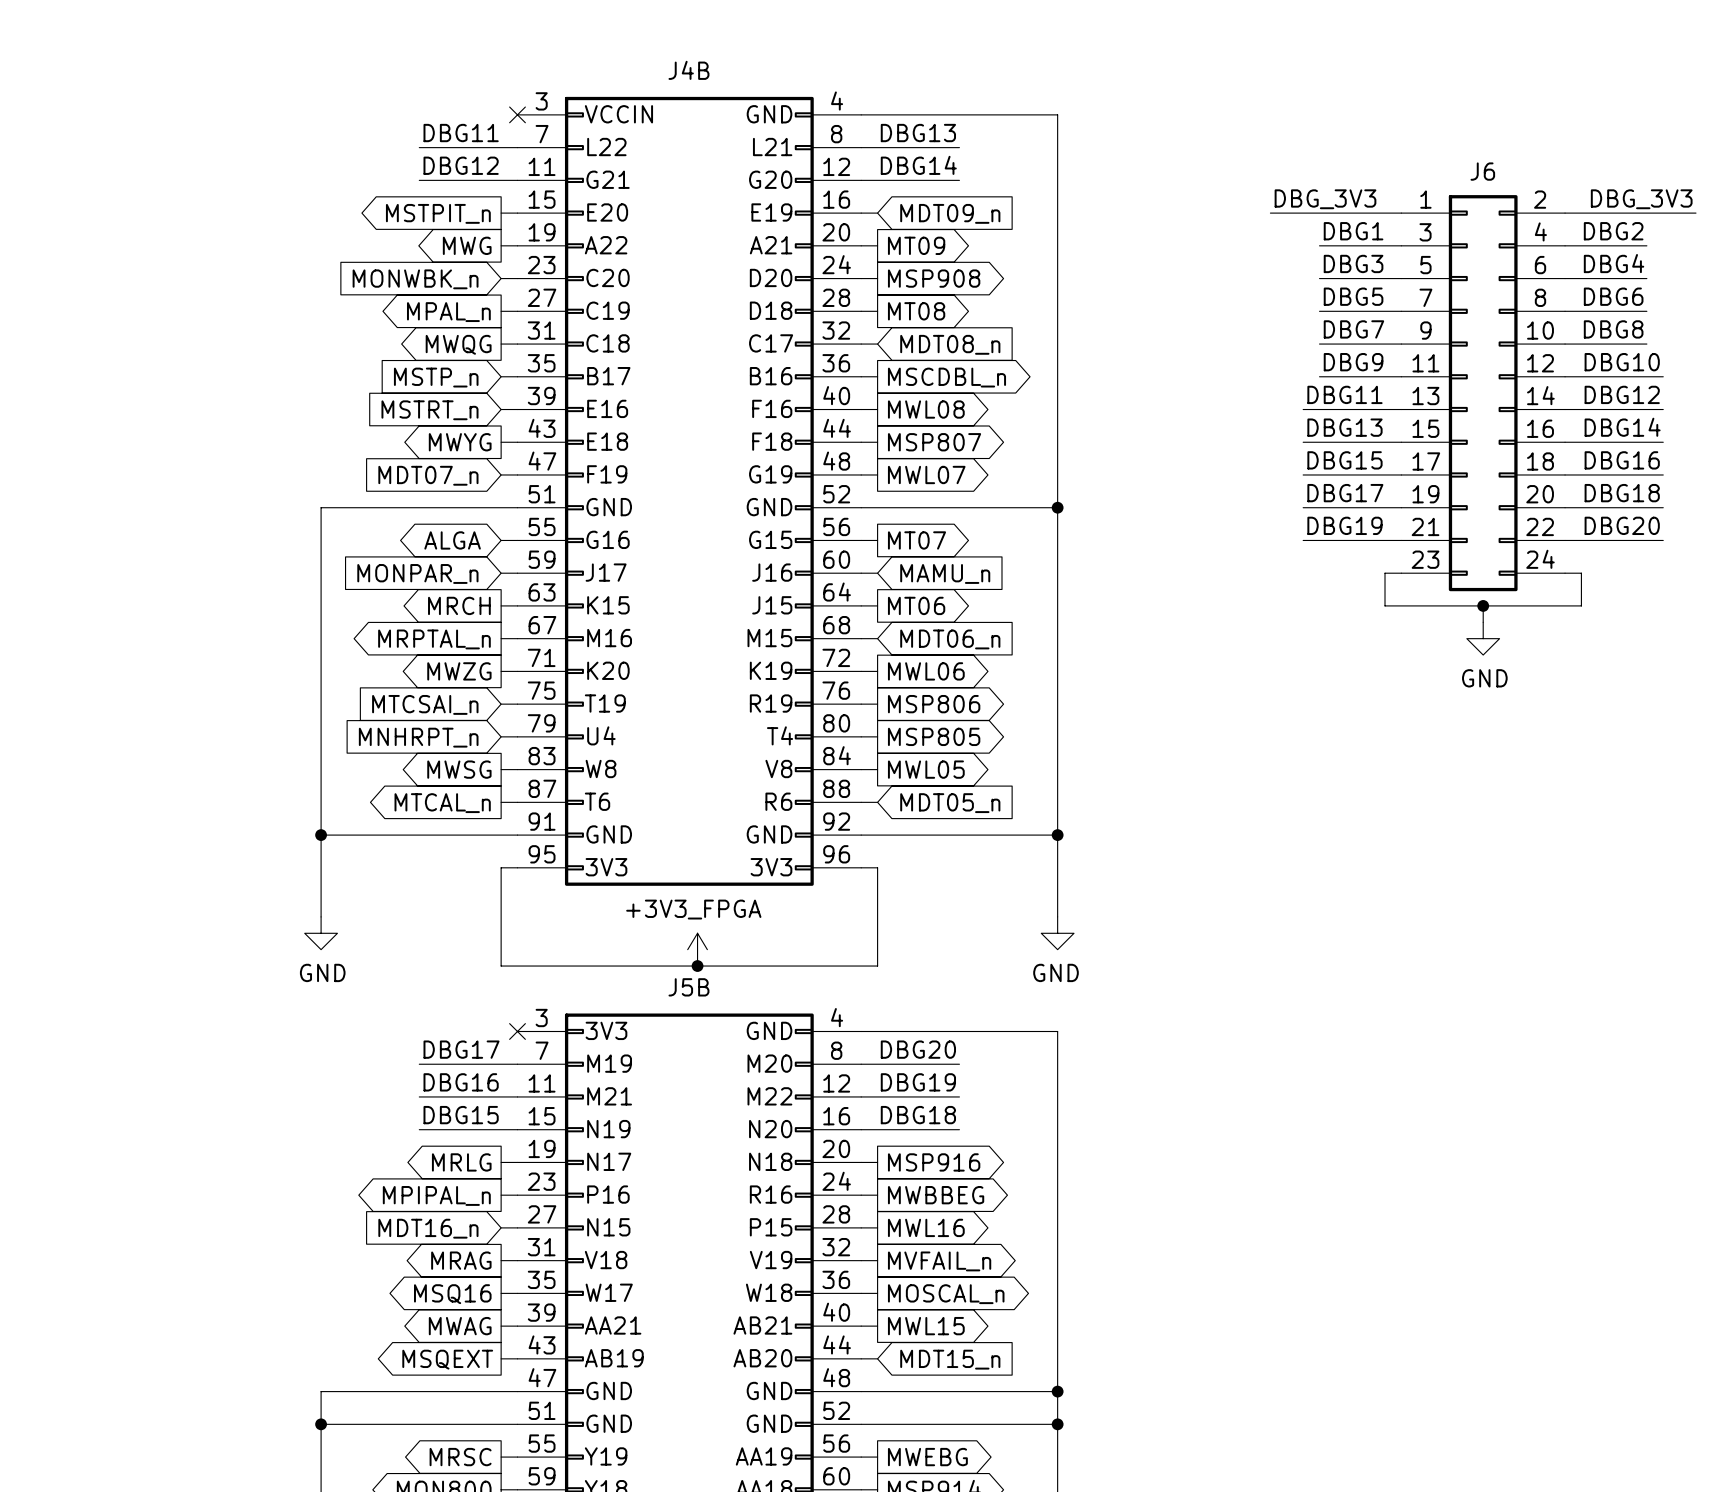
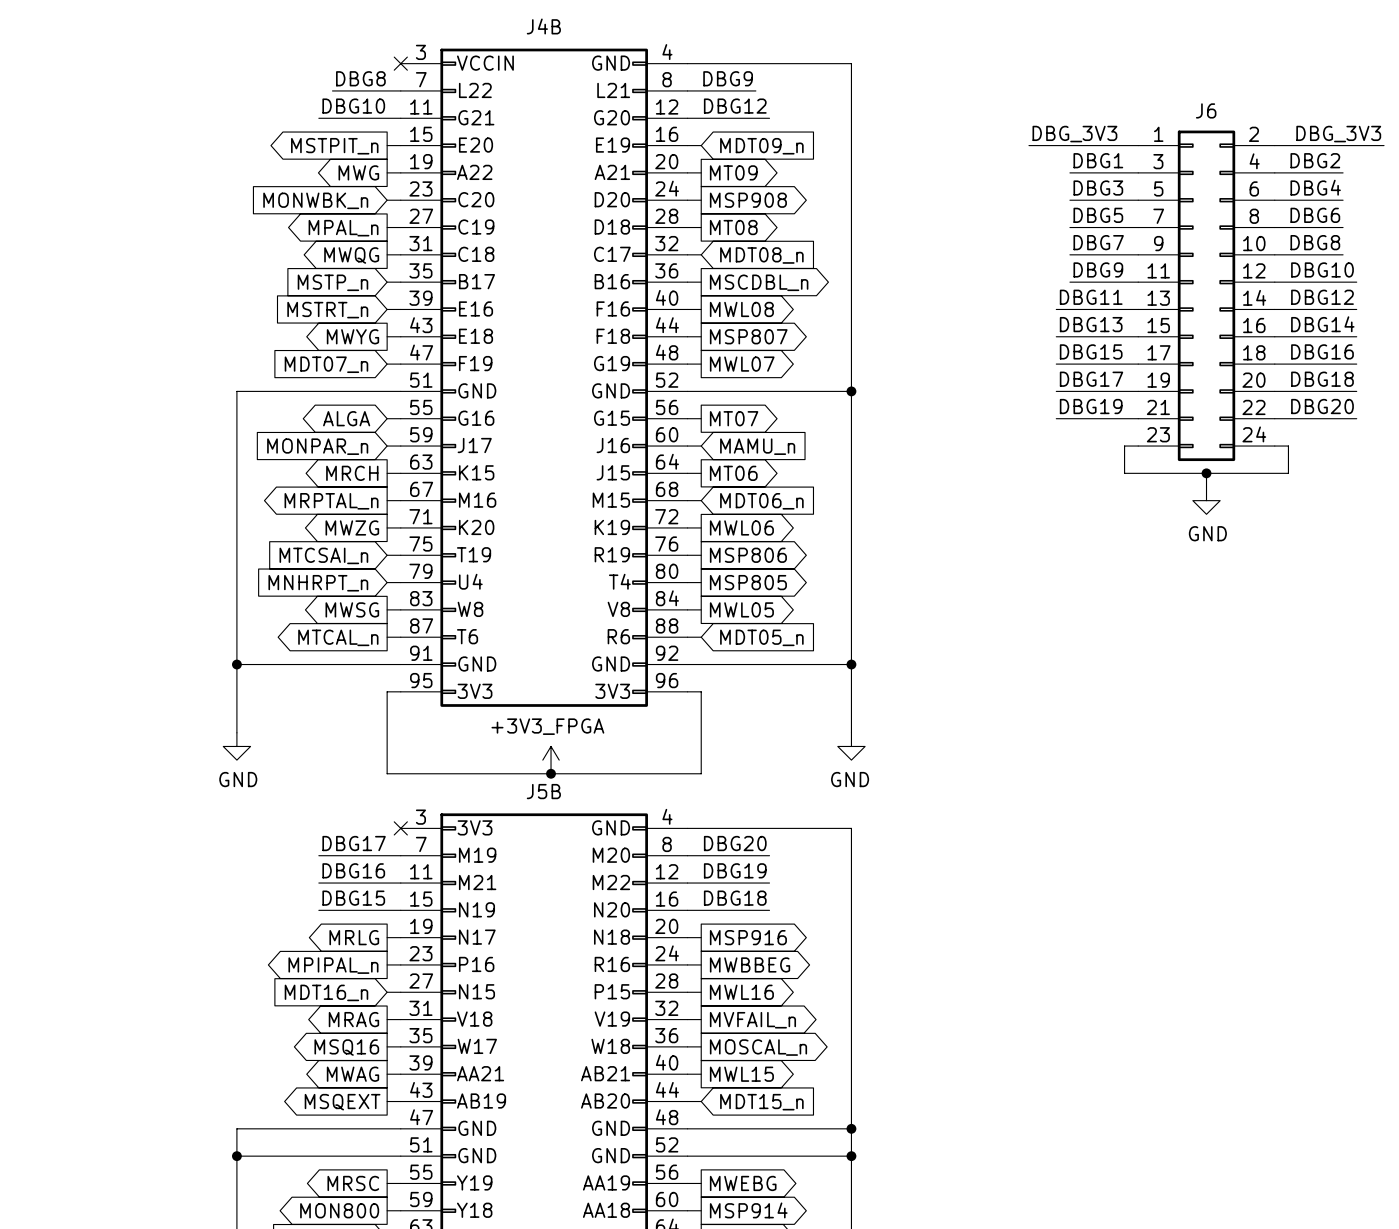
label: DBG11 (461, 133) -> DBG8 (360, 78)
label: DBG13 (918, 133) -> DBG9 (728, 78)
wire: (419, 147) (435, 147) -> none
wire: (943, 147) (959, 147) -> none
label: DBG12 (461, 165) -> DBG10 (353, 106)
label: DBG14 (918, 165) -> DBG12 (735, 106)

